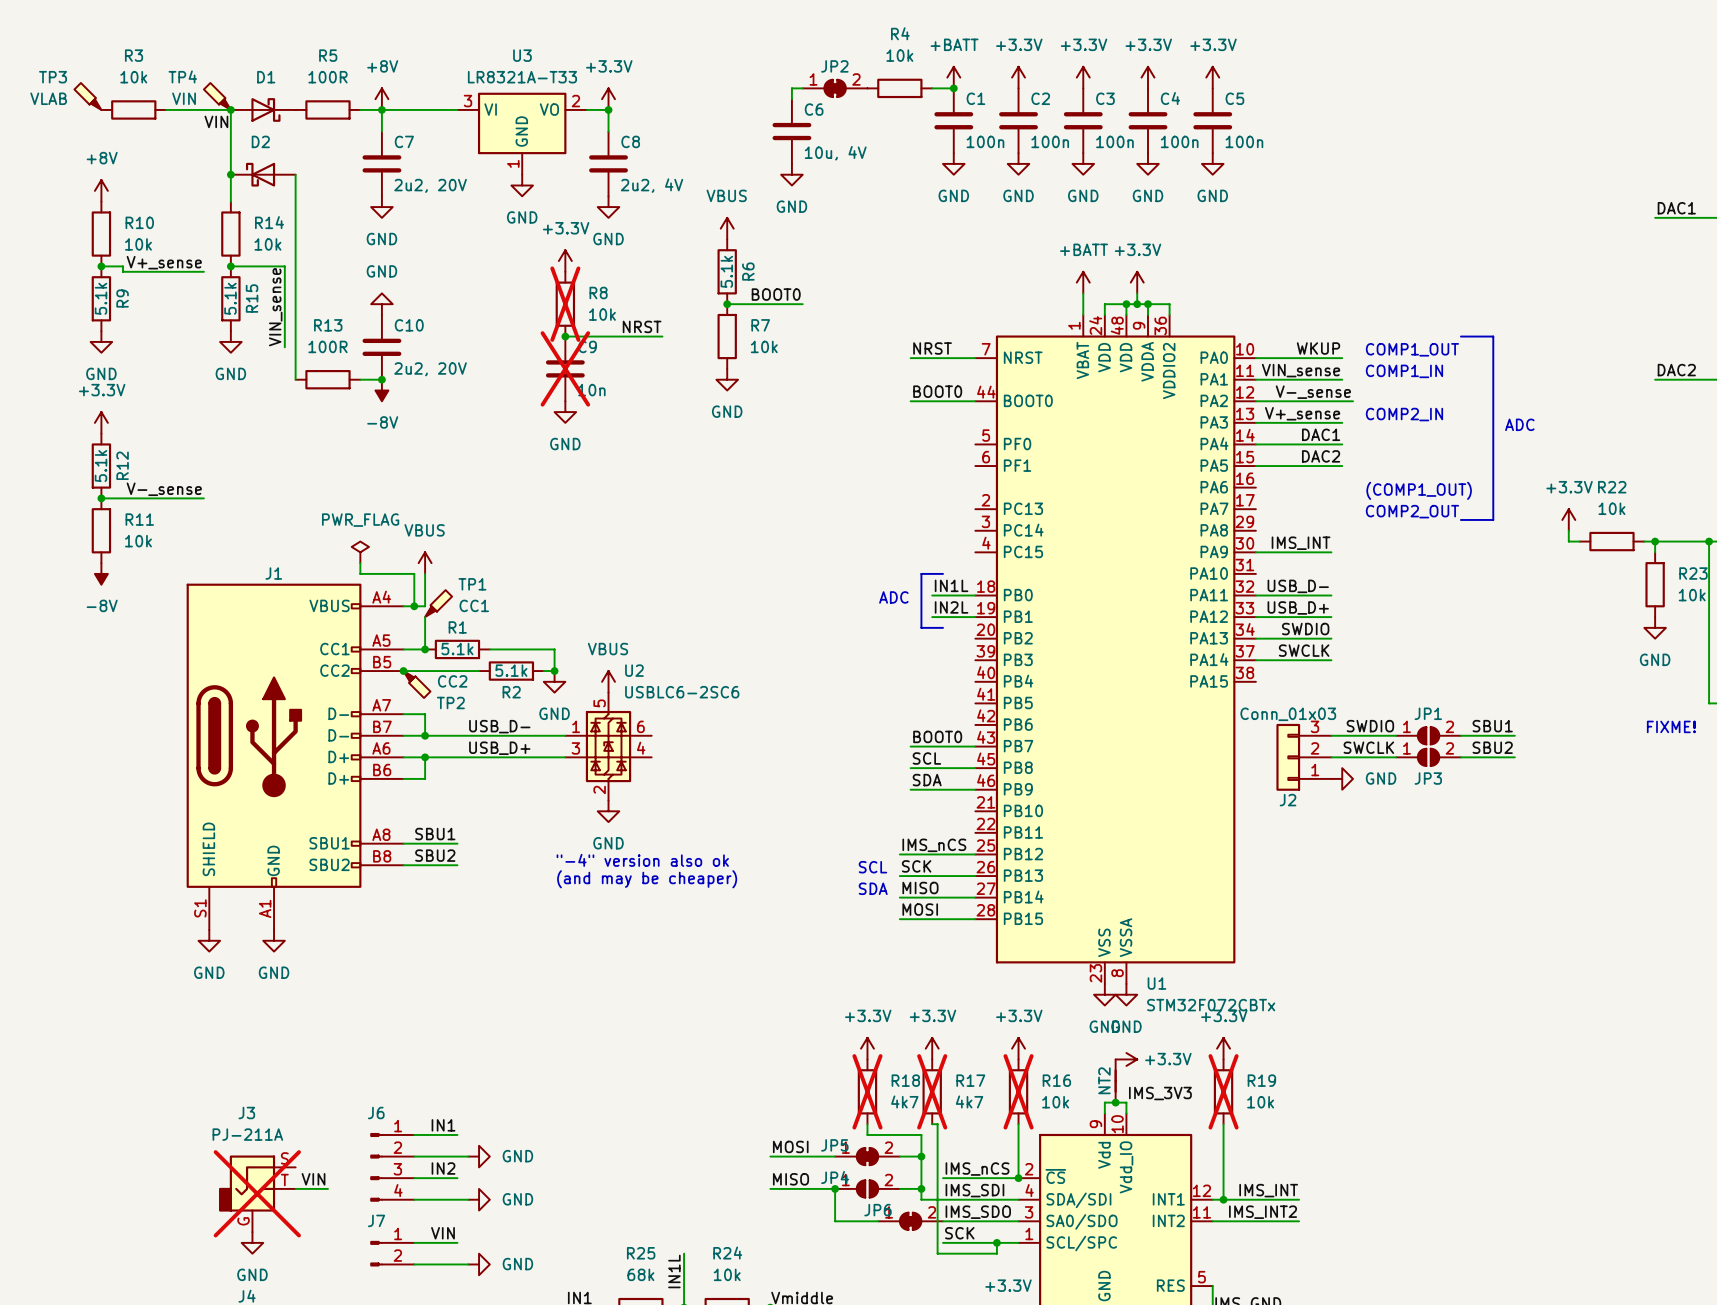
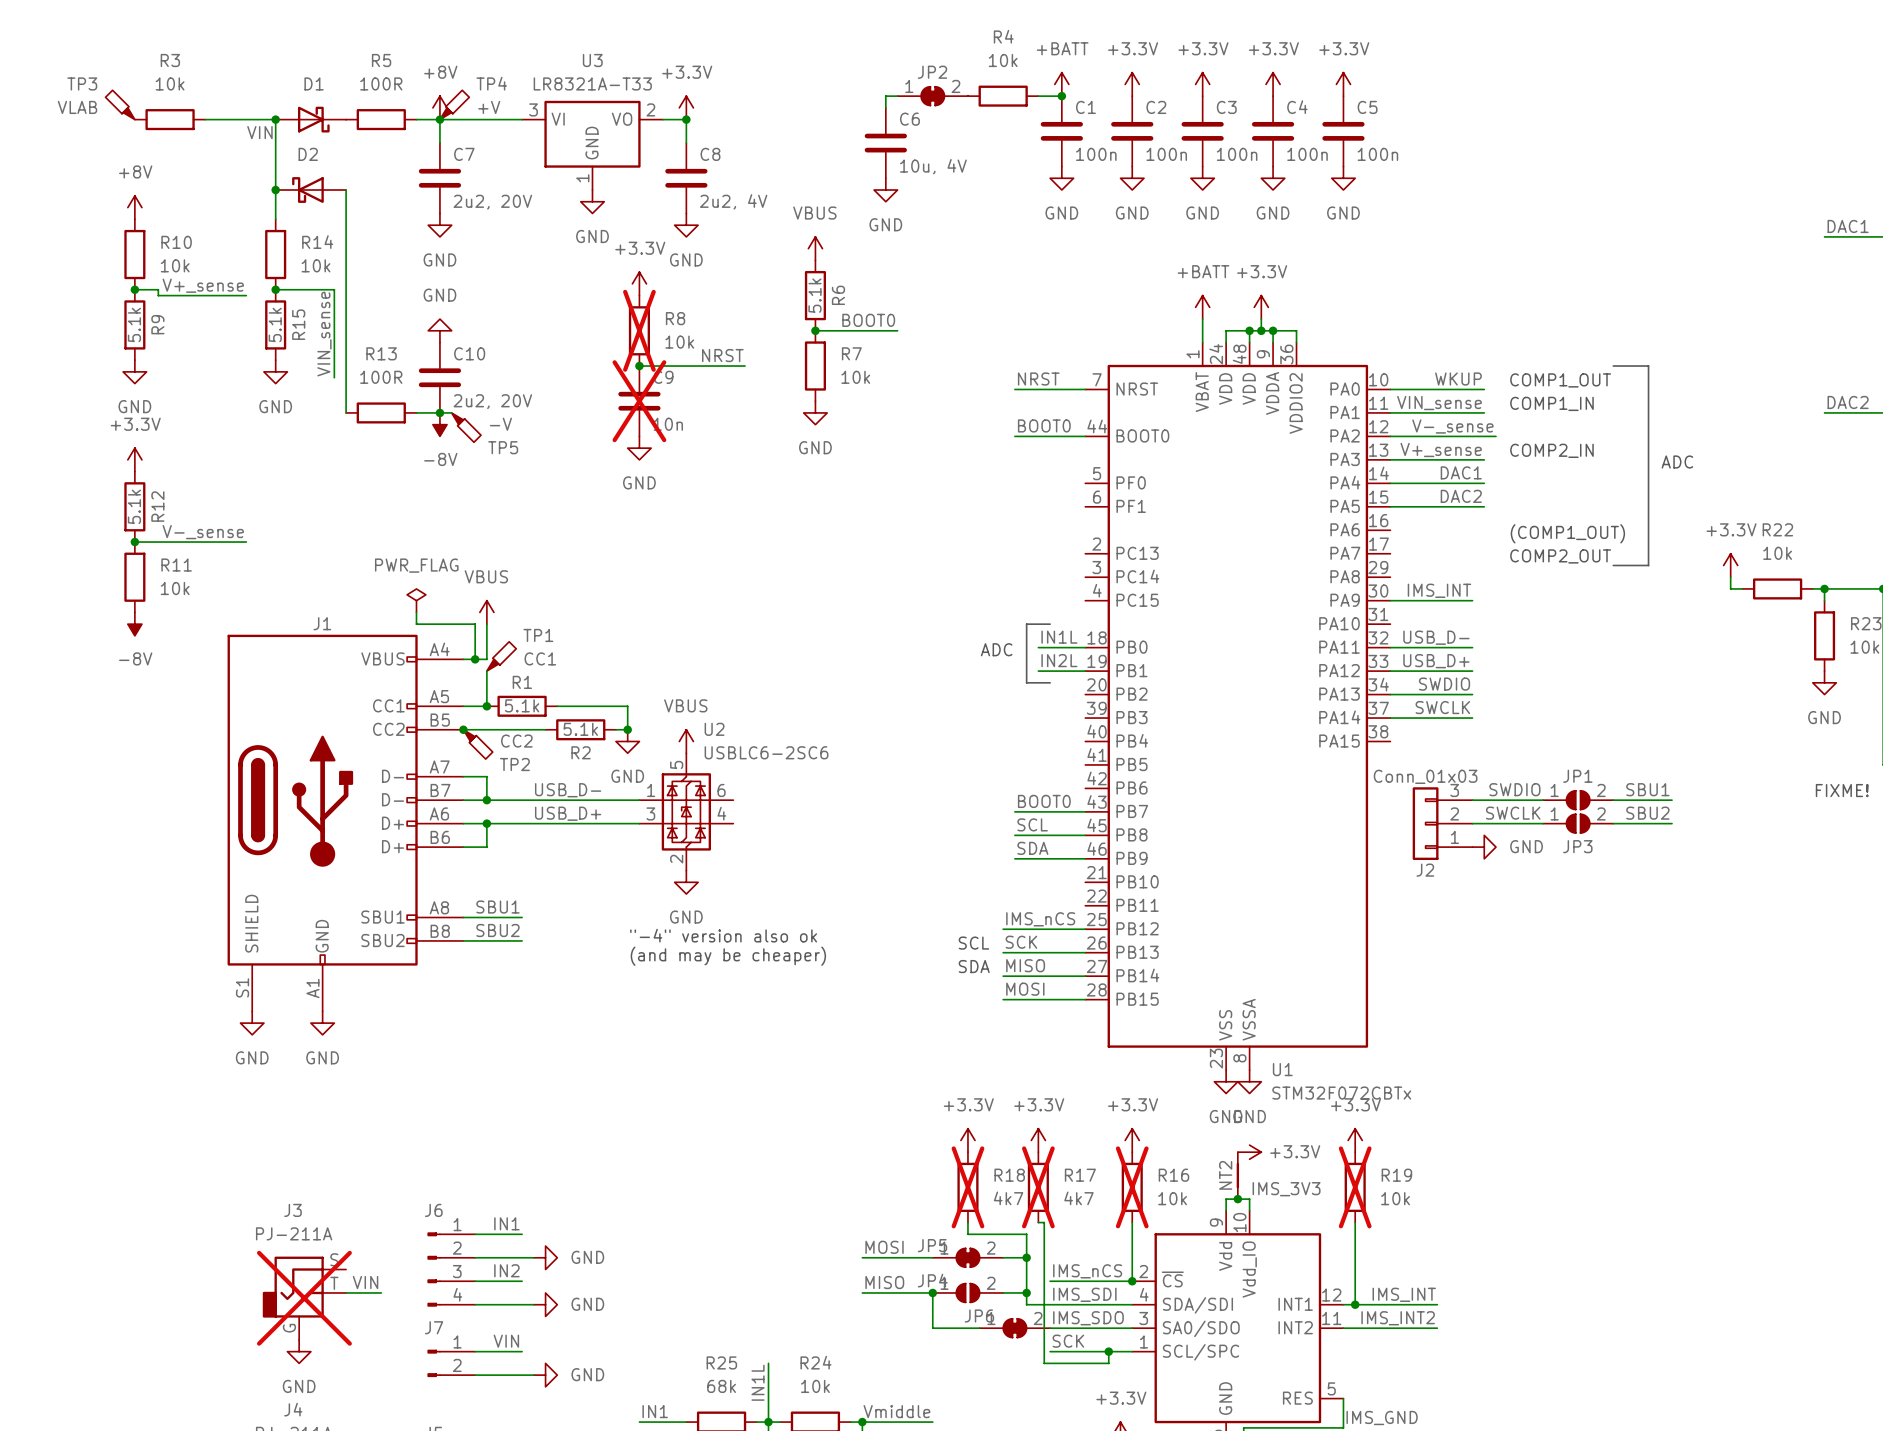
TP4 name position: TP4 (182, 76) -> TP4 (491, 83)
TP4 rotation: 0° (217, 96) -> 90° clockwise (454, 104)
TP4 position: (217, 96) -> (454, 104)
TP4 value: VIN (184, 98) -> +V (489, 107)
wire: none -> (439, 412) (451, 412)
TP5: none -> -V (466, 427)

